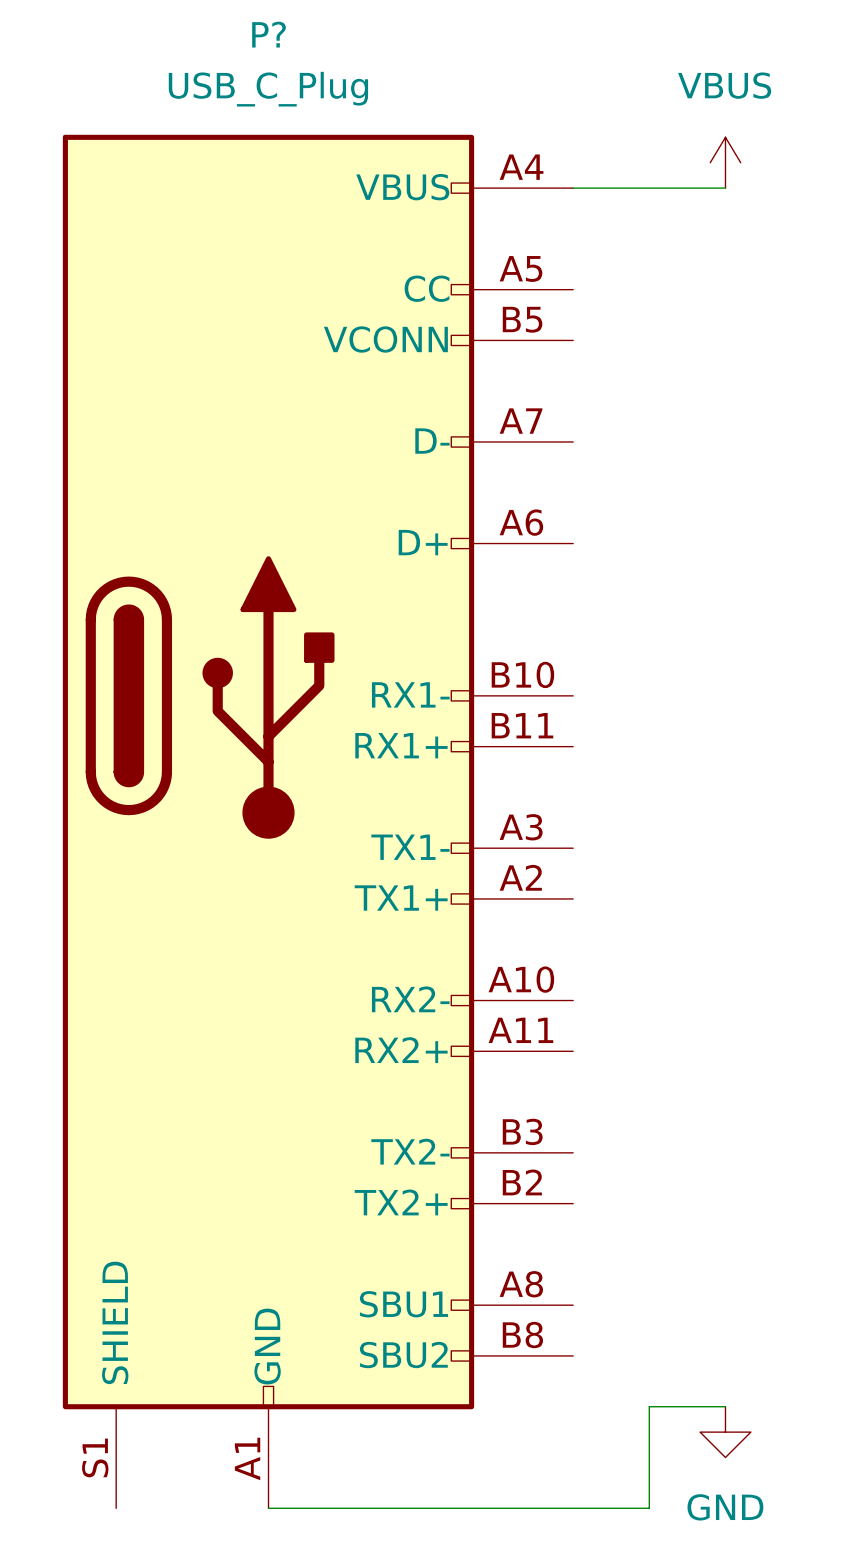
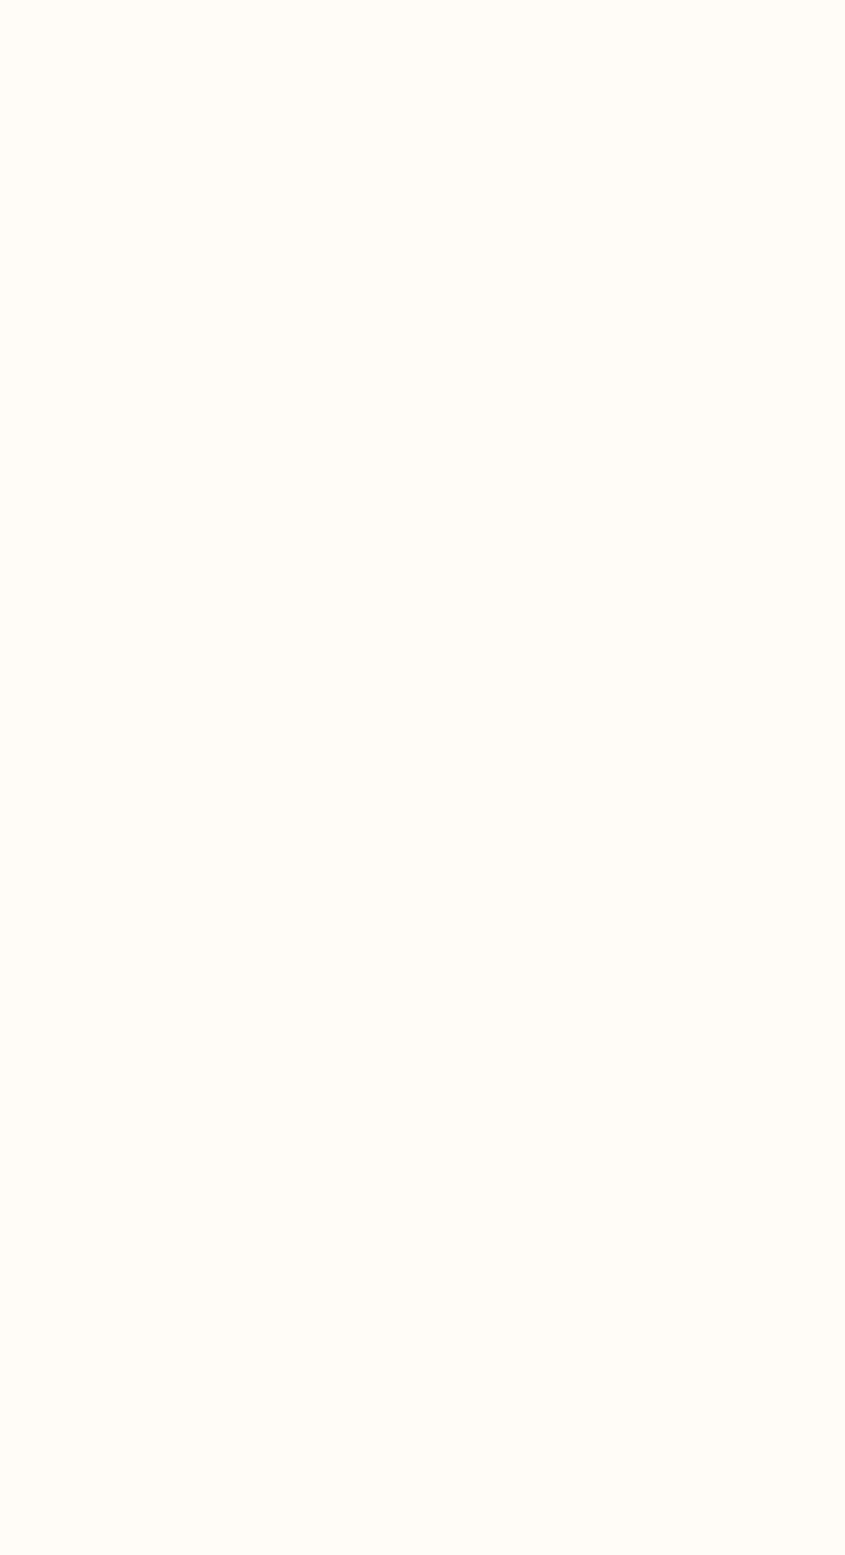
power symbol: VBUS (725, 162) -> none
wire: (573, 188) (725, 188) -> none
P?: USB_C_Plug (318, 821) -> none
wire: (725, 1406) (649, 1406) (649, 1508) (268, 1508) -> none
power symbol: GND (725, 1432) -> none

